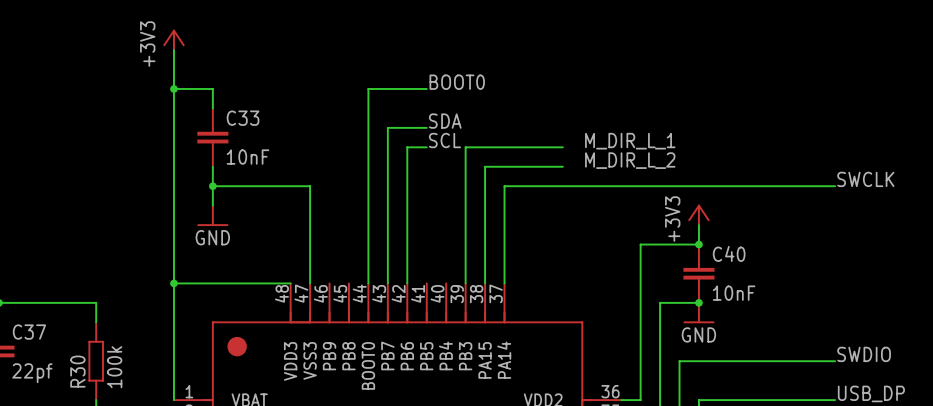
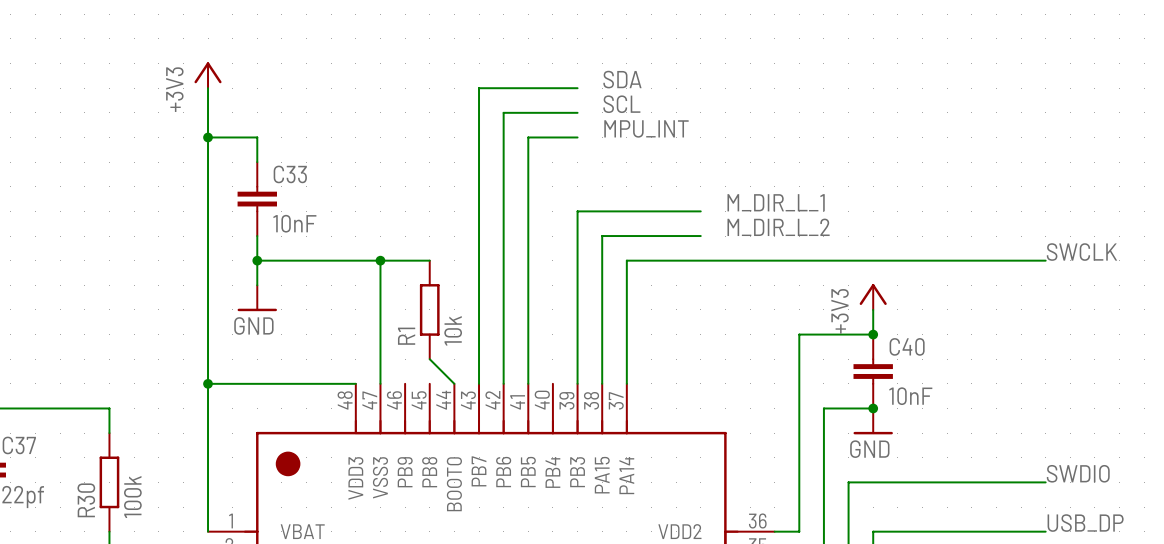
label: BOOT0 (457, 82) -> none
label: none -> MPU_INT (646, 128)
wire: (426, 88) (368, 88) (368, 283) -> (429, 359) (454, 383)
wire: none -> (577, 137) (528, 137) (528, 383)
label position: SDA (445, 121) -> SDA (622, 79)
wire: (387, 127) (426, 127) -> (479, 186) (479, 88) (577, 88)
label position: SCL (444, 140) -> SCL (621, 104)
wire: (407, 147) (426, 147) -> (503, 211) (503, 112) (577, 112)
wire: none -> (380, 260) (429, 260)
junction: none -> (380, 260)
R1: none -> 10k (429, 309)

